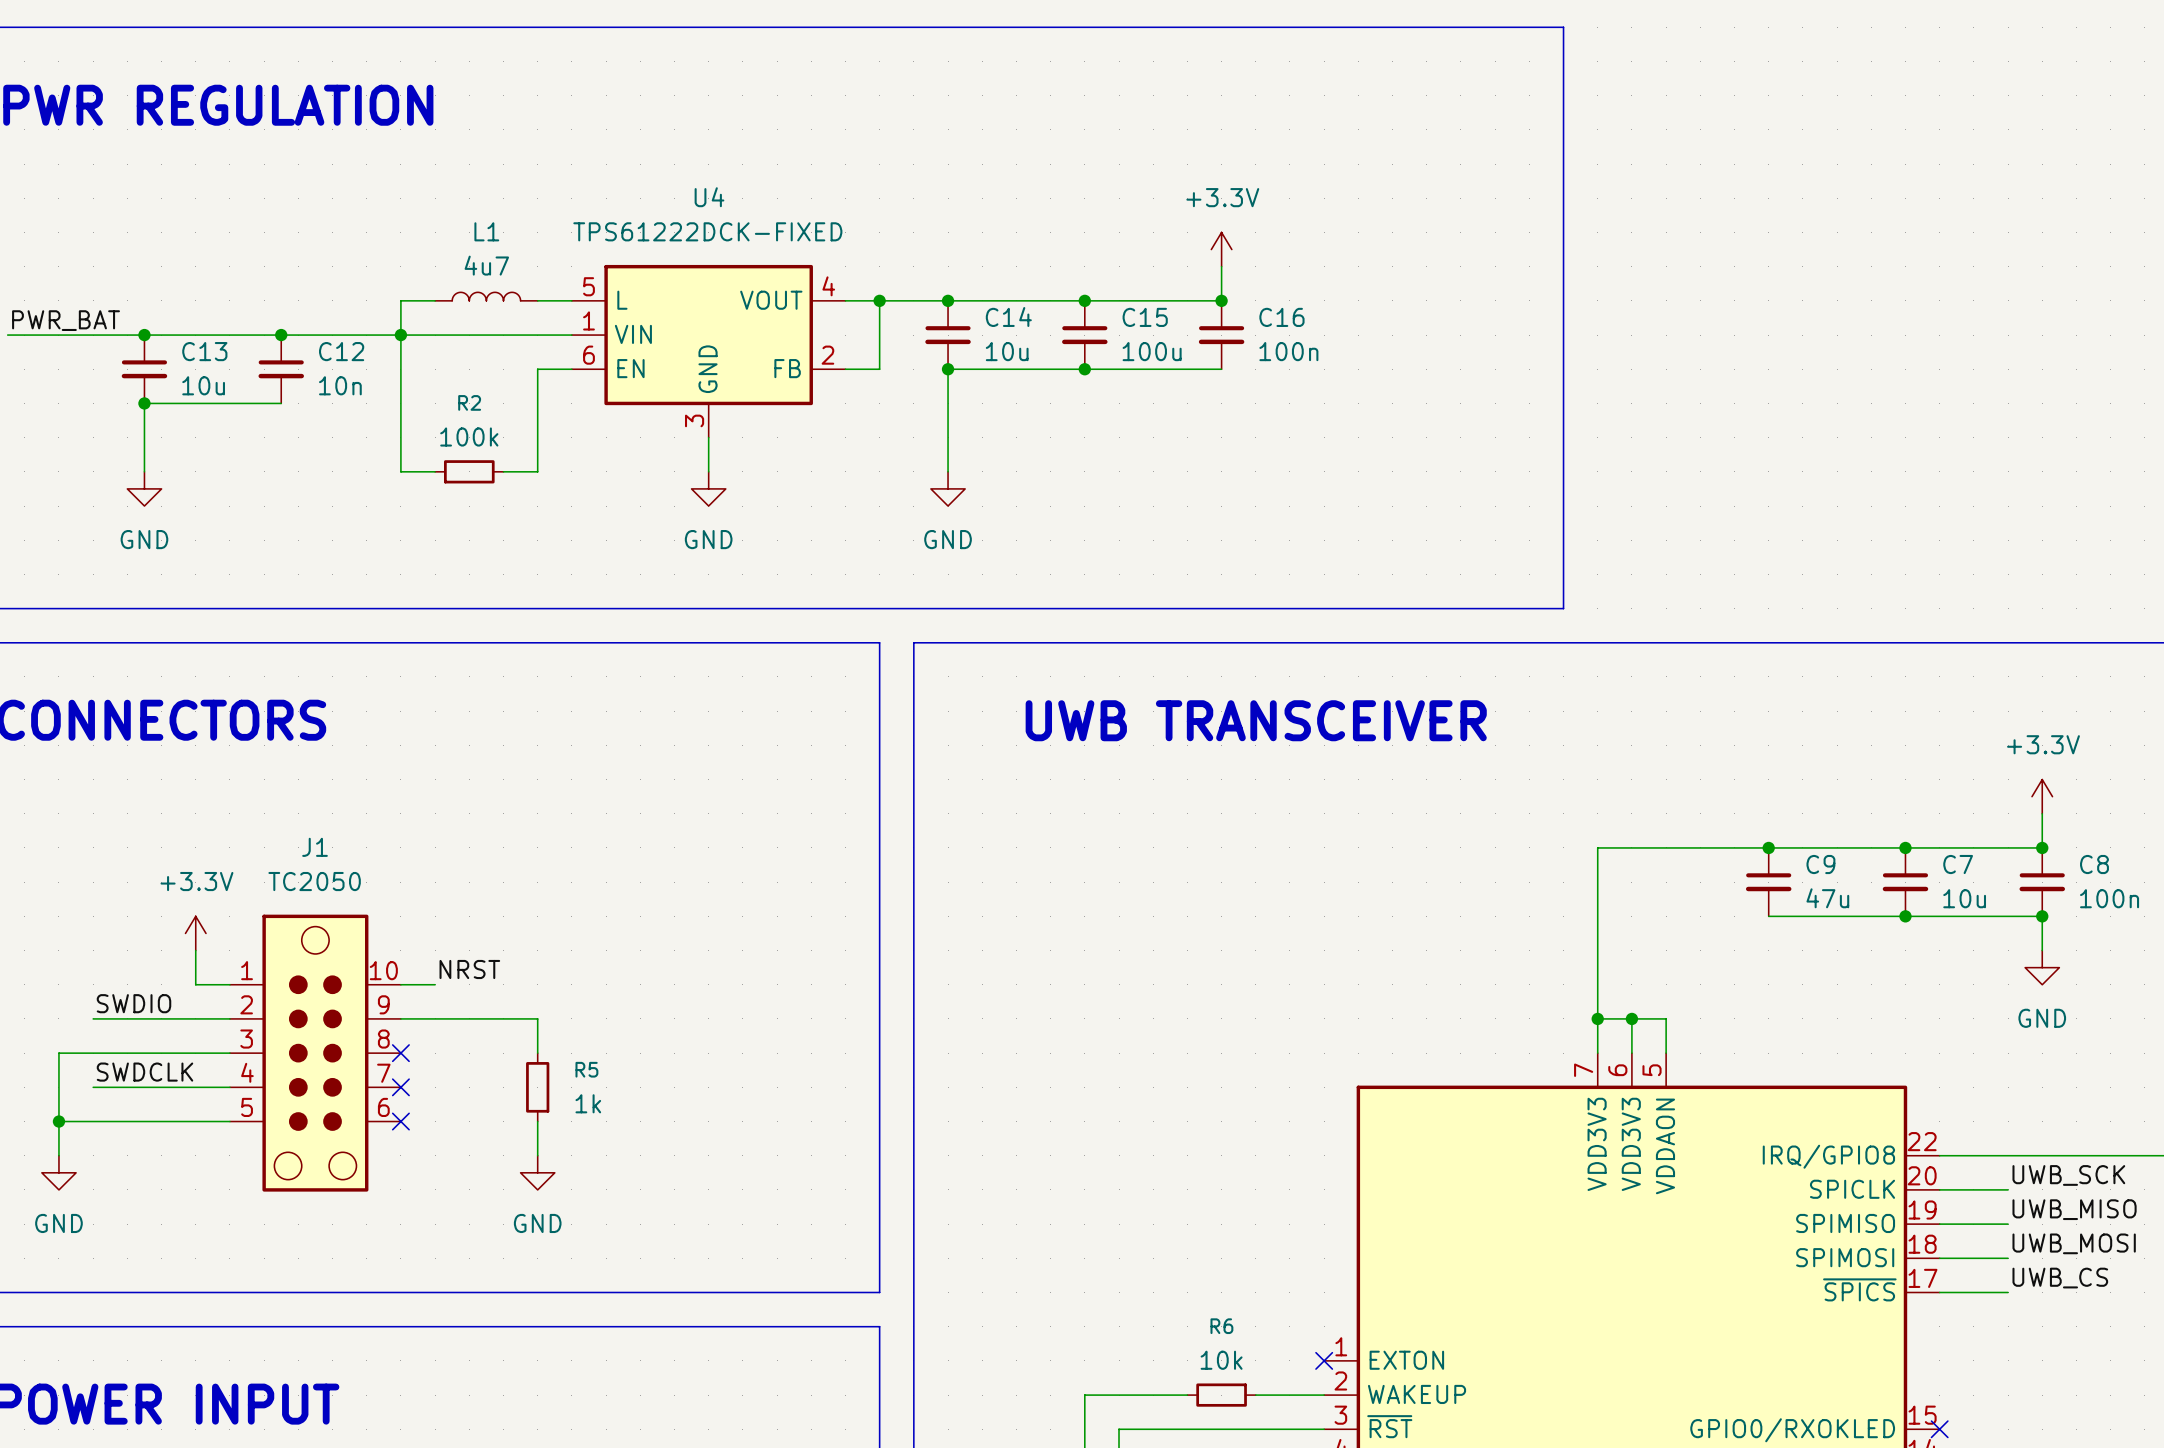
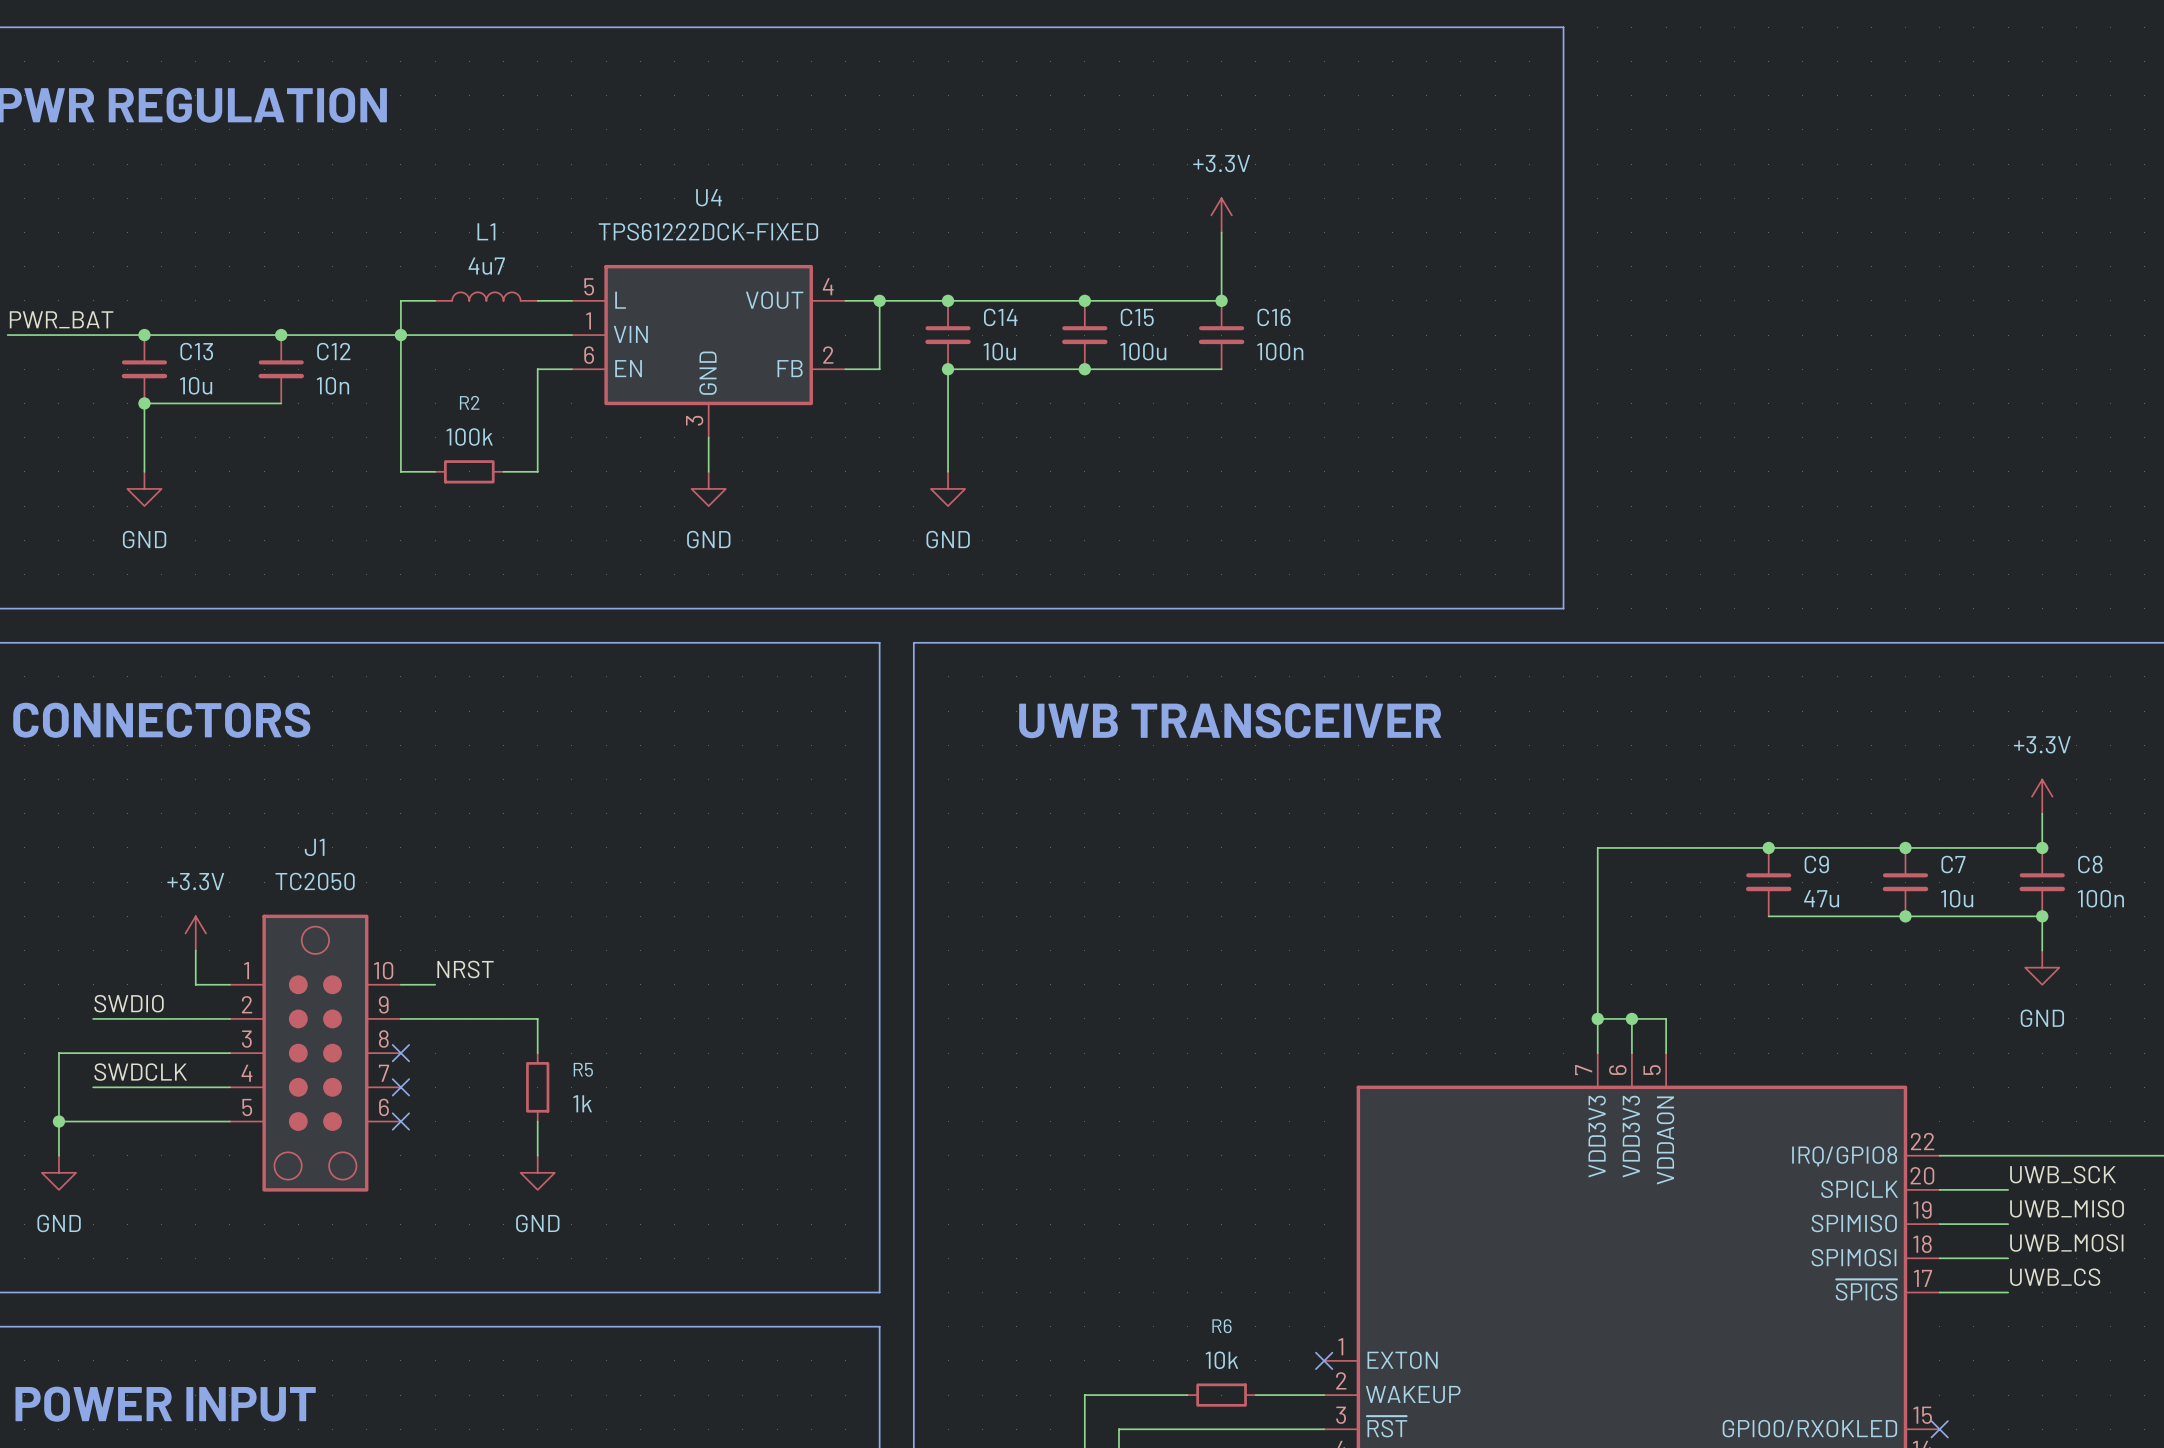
power symbol position: +3.3V (1221, 249) -> +3.3V (1221, 215)

